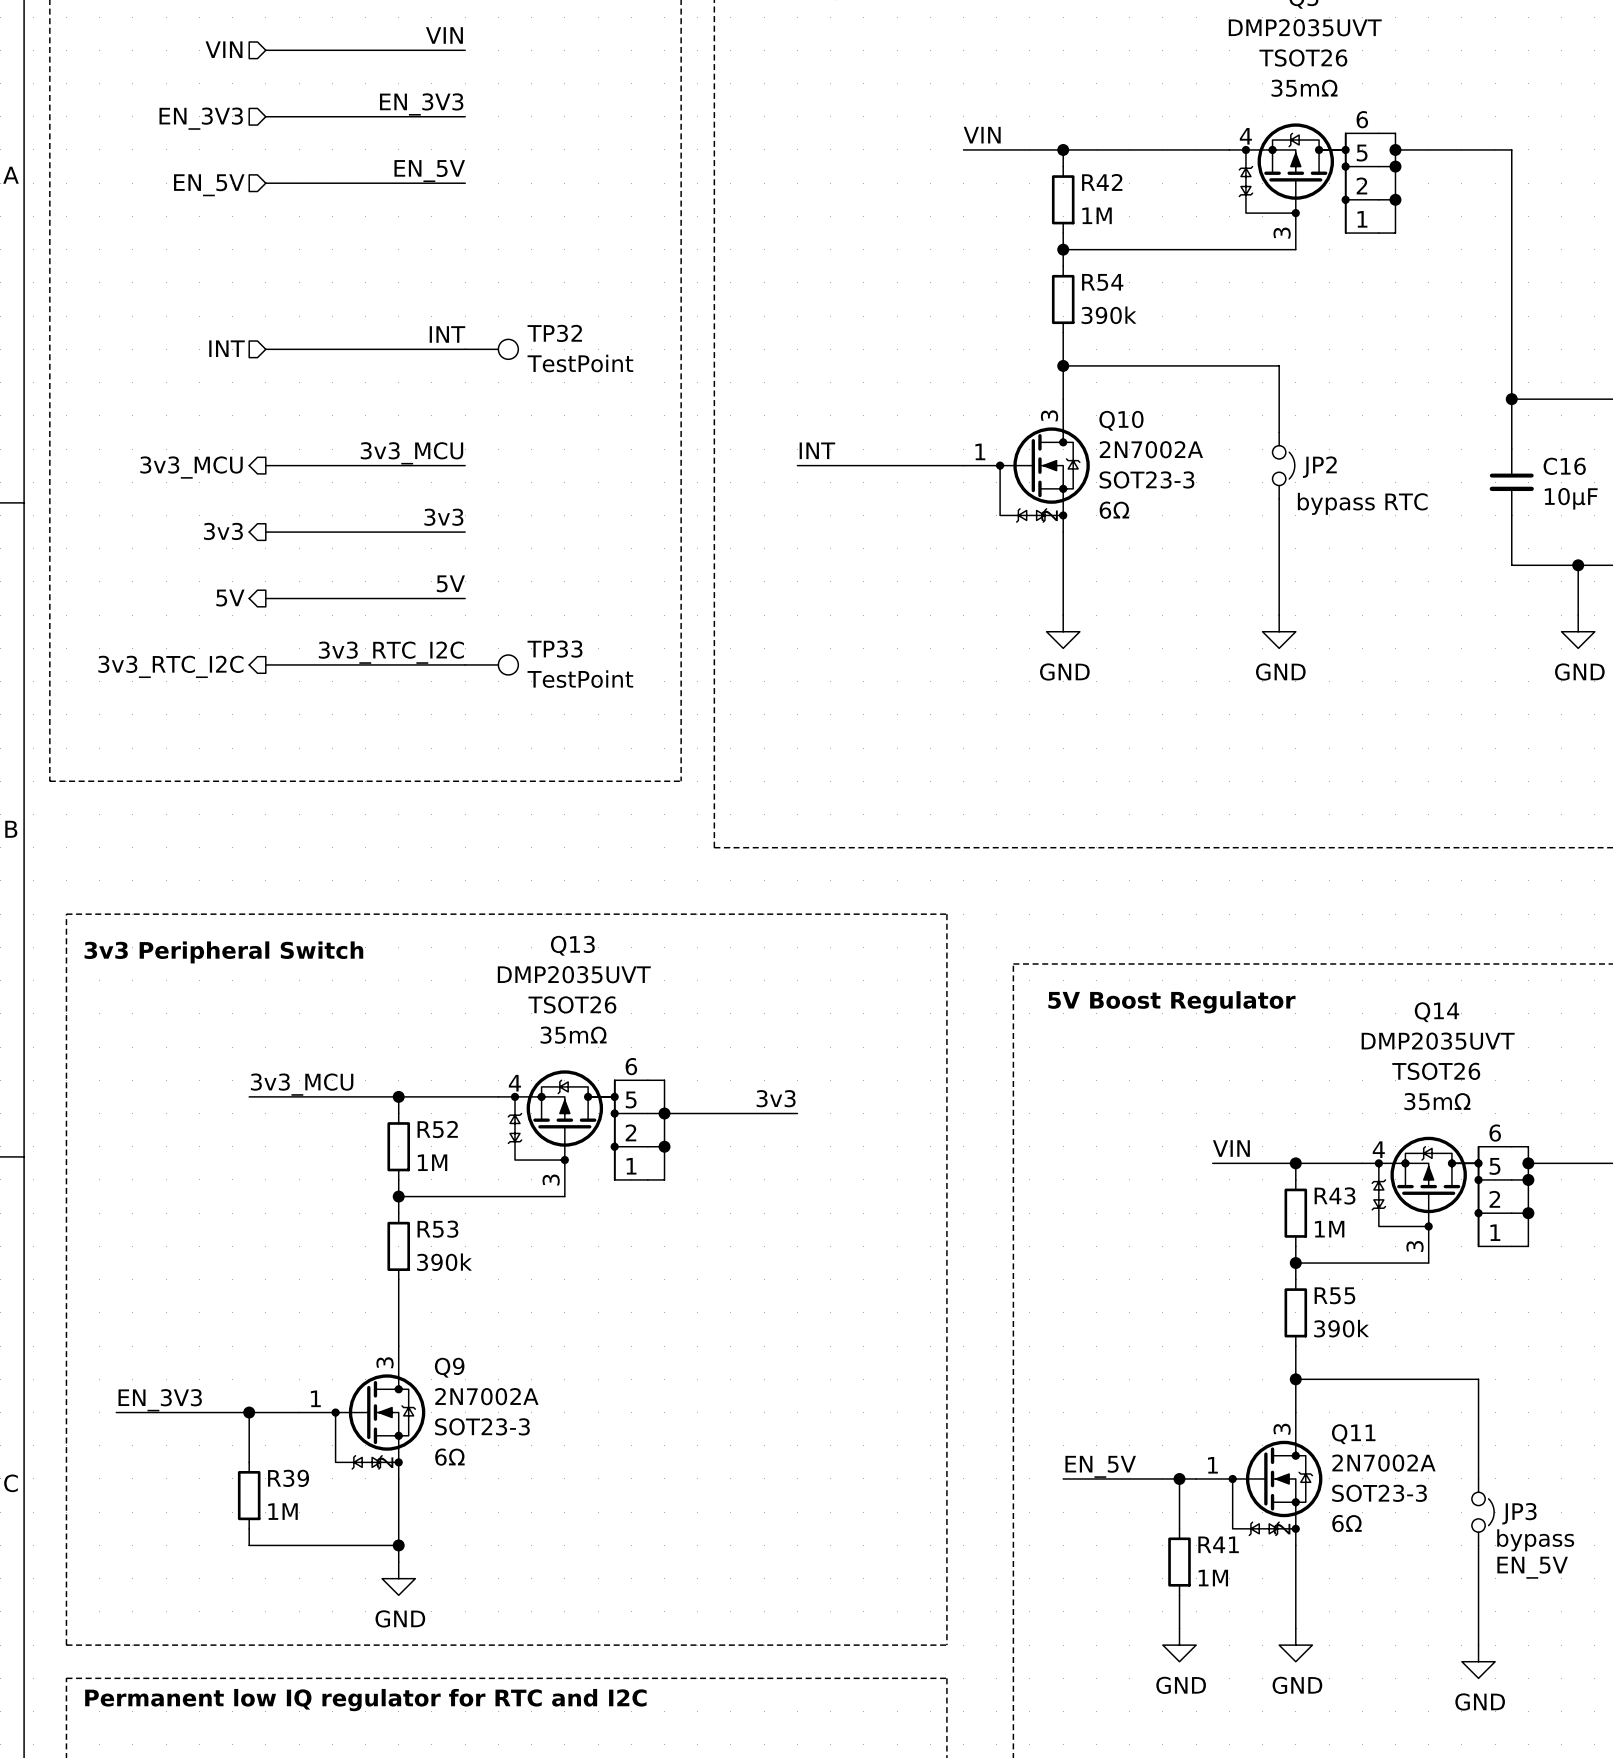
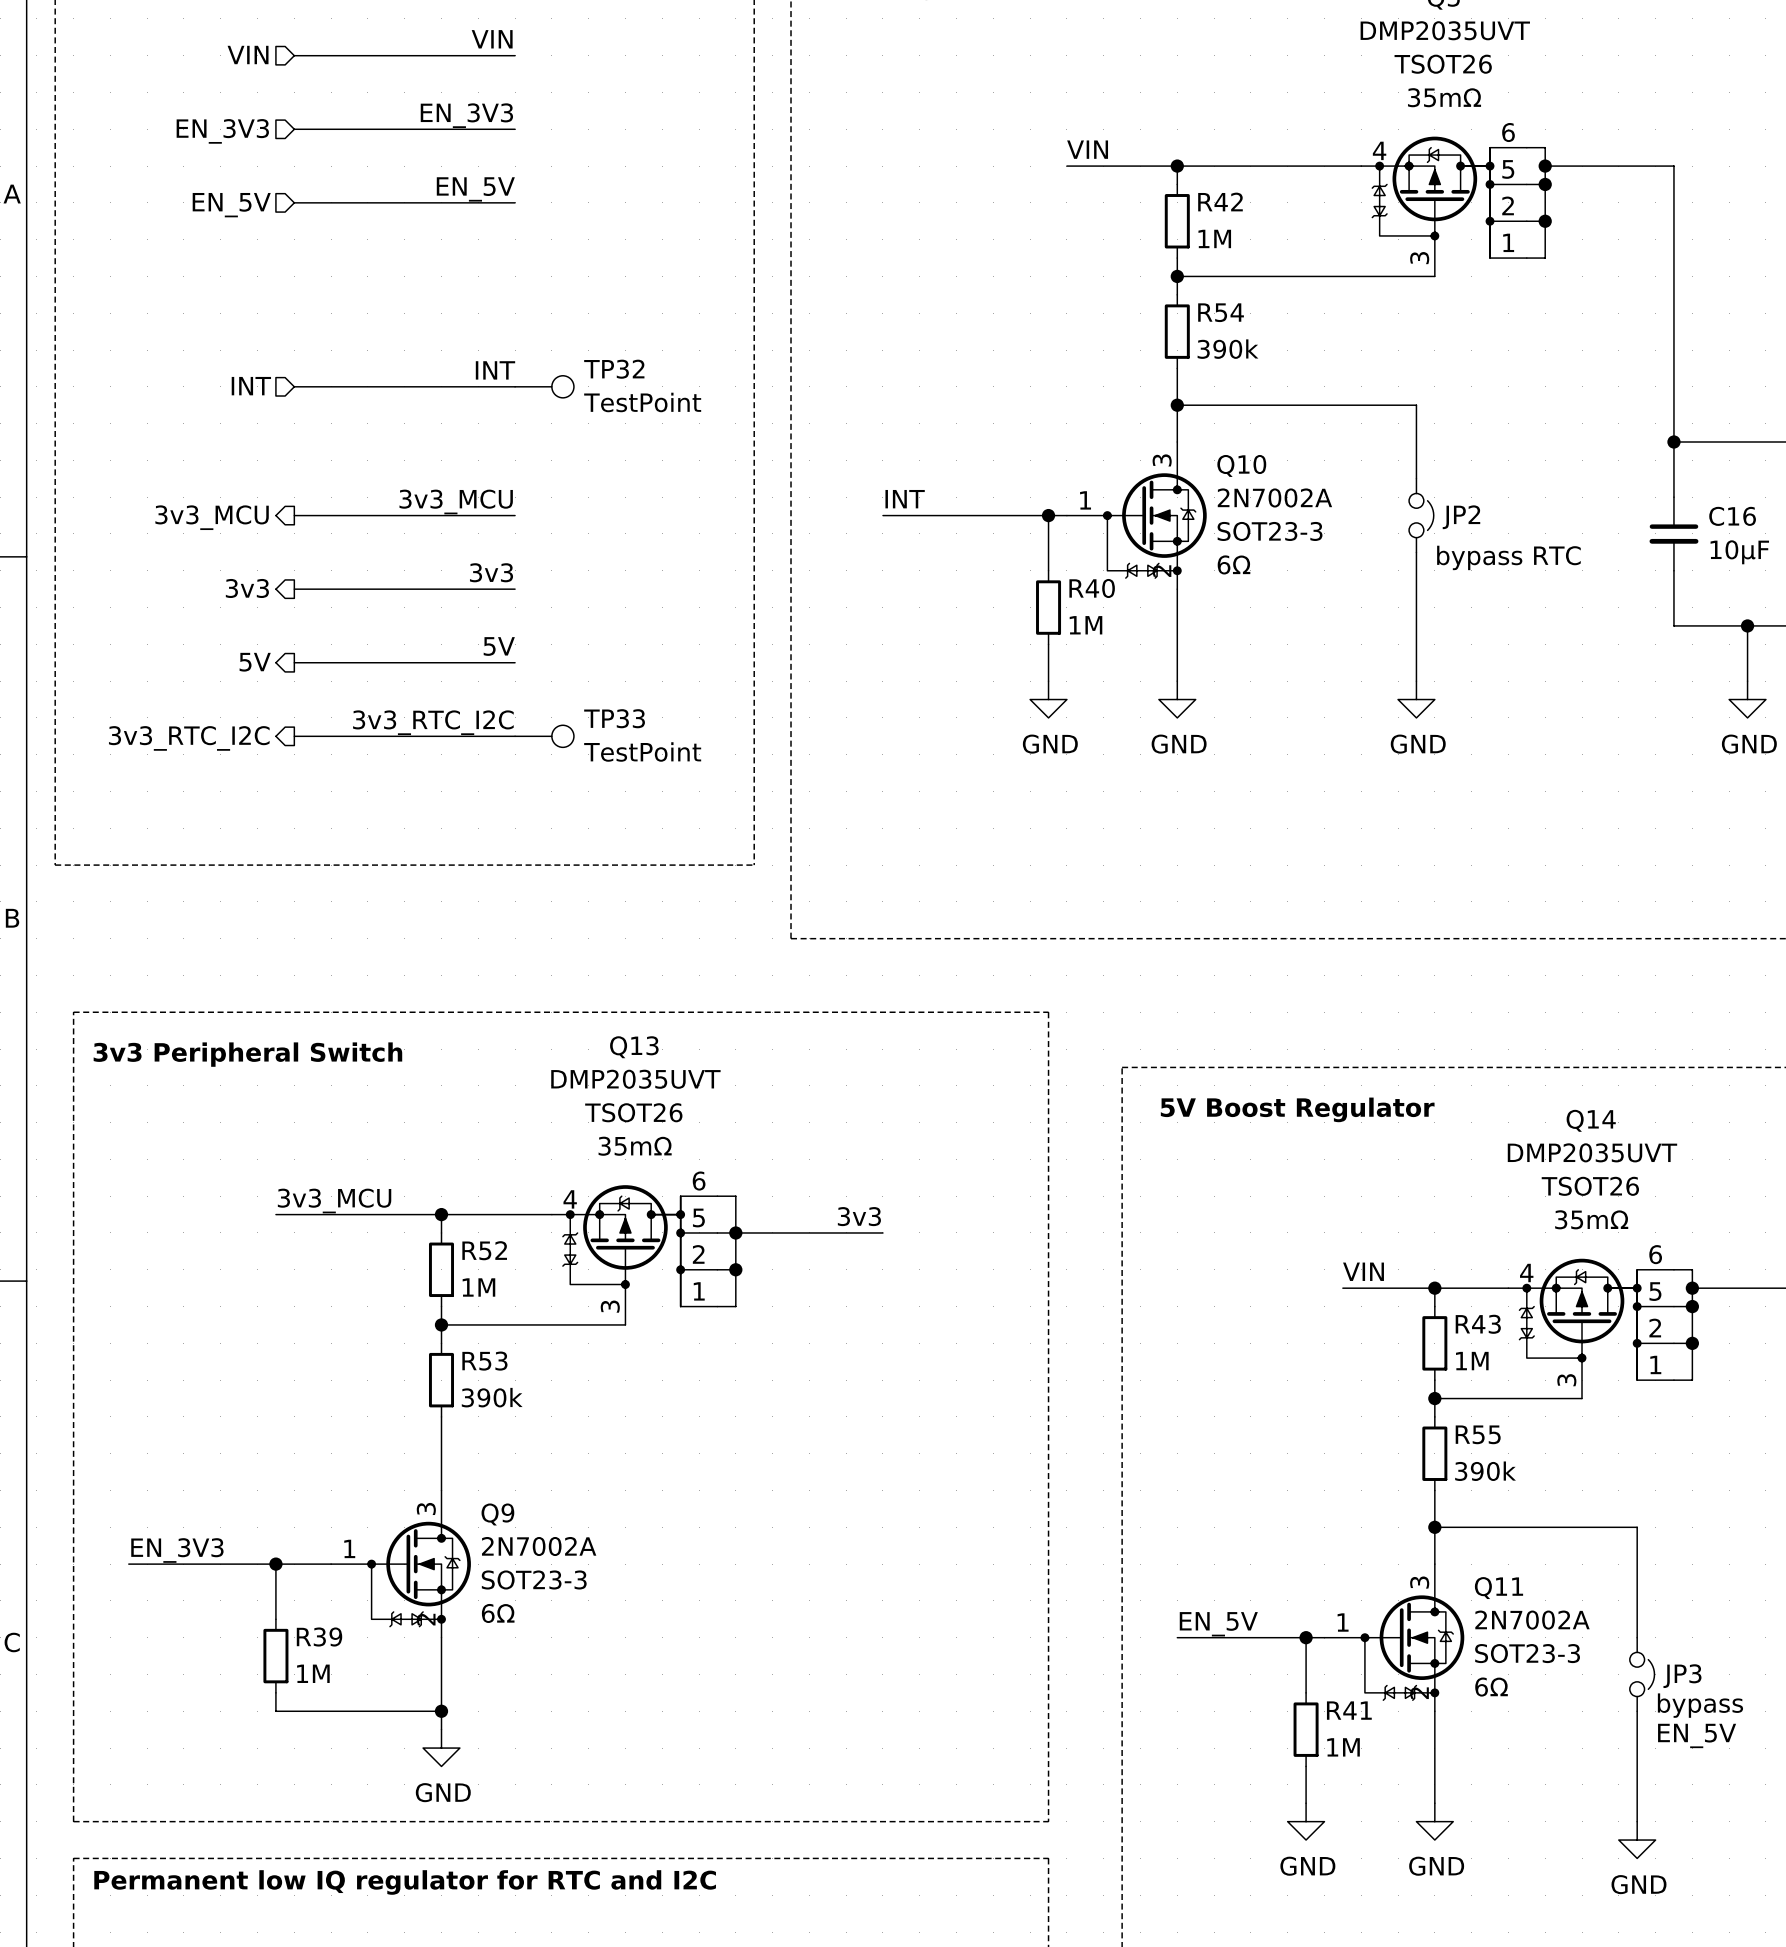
wire: none -> (1048, 515) (1048, 570)
junction: none -> (1048, 515)
R40: none -> 1M (1048, 607)
wire: none -> (1048, 644) (1048, 681)
power symbol: none -> GND (1048, 699)

